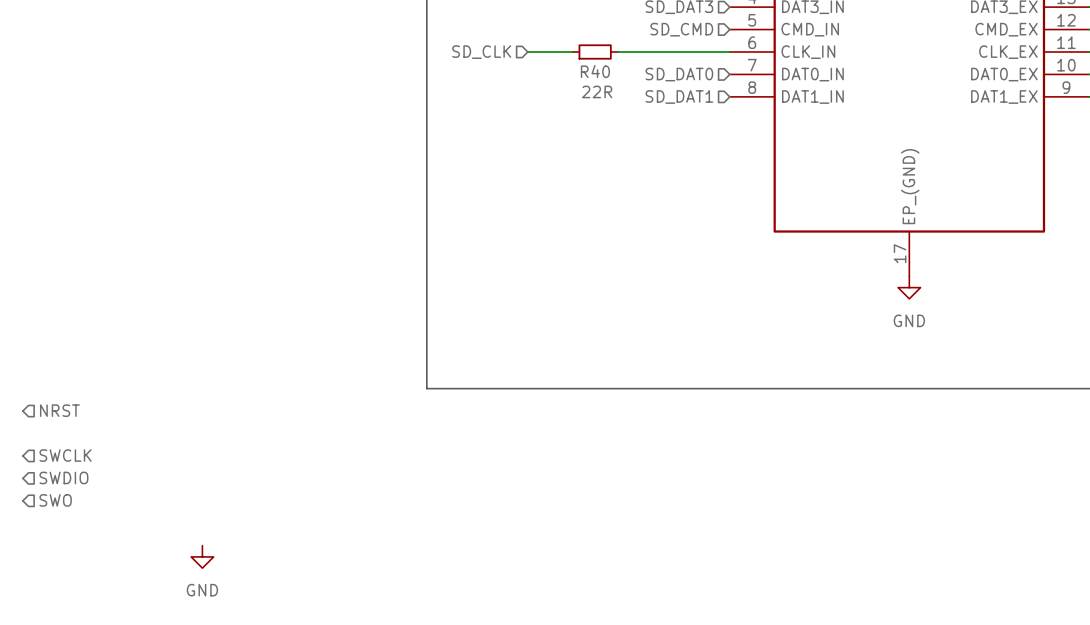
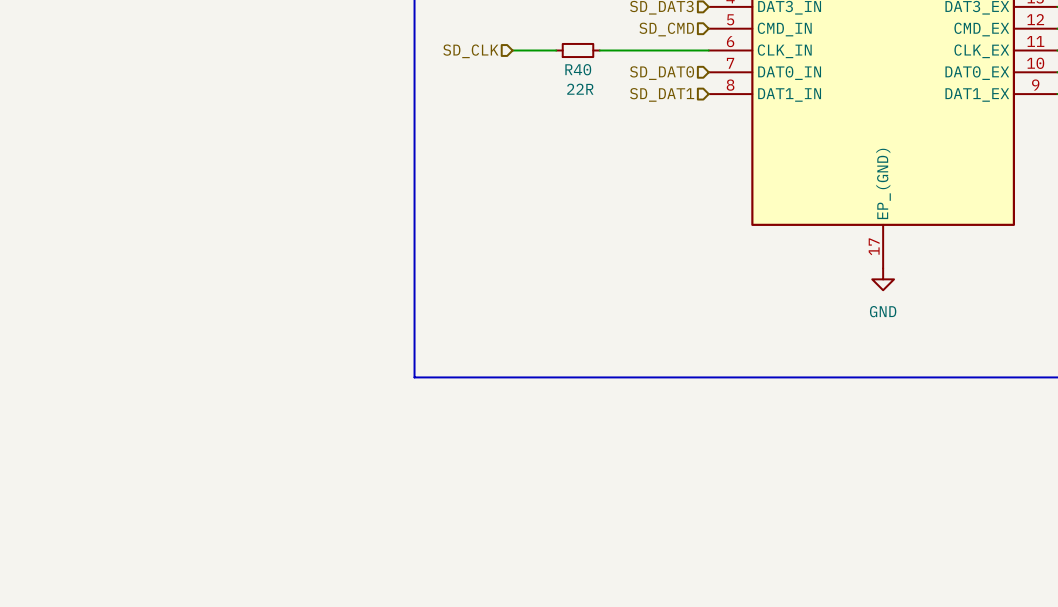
hierarchical label: NRST (59, 410) -> none
hierarchical label: SWCLK (65, 455) -> none
hierarchical label: SWDIO (63, 477) -> none
hierarchical label: SWO (55, 500) -> none
power symbol: GND (202, 556) -> none

